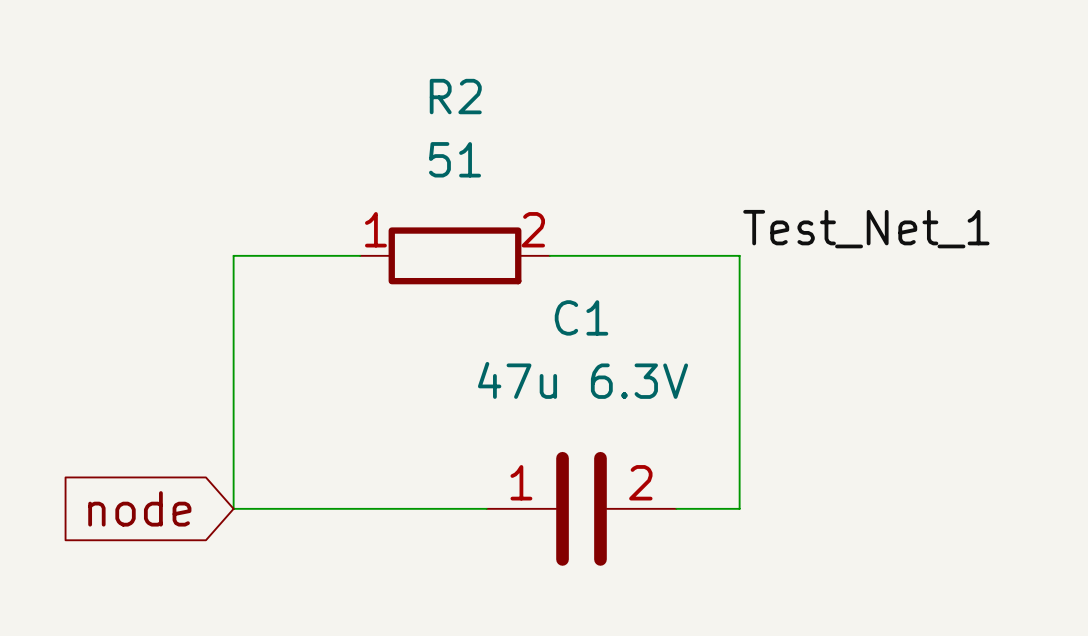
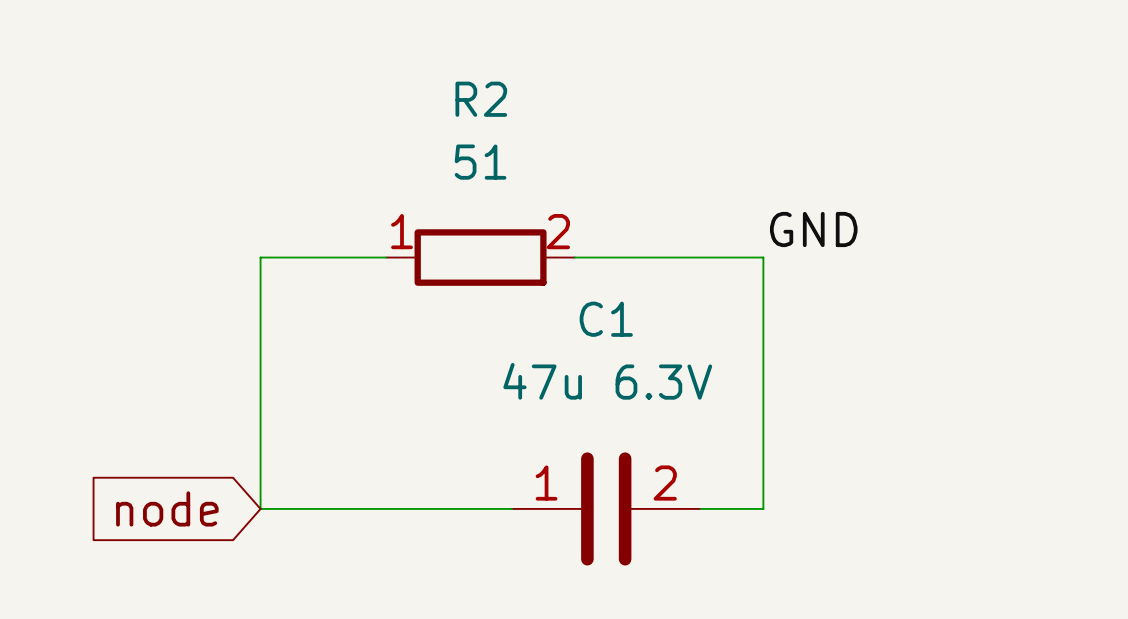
label: Test_Net_1 (866, 229) -> GND (813, 229)

